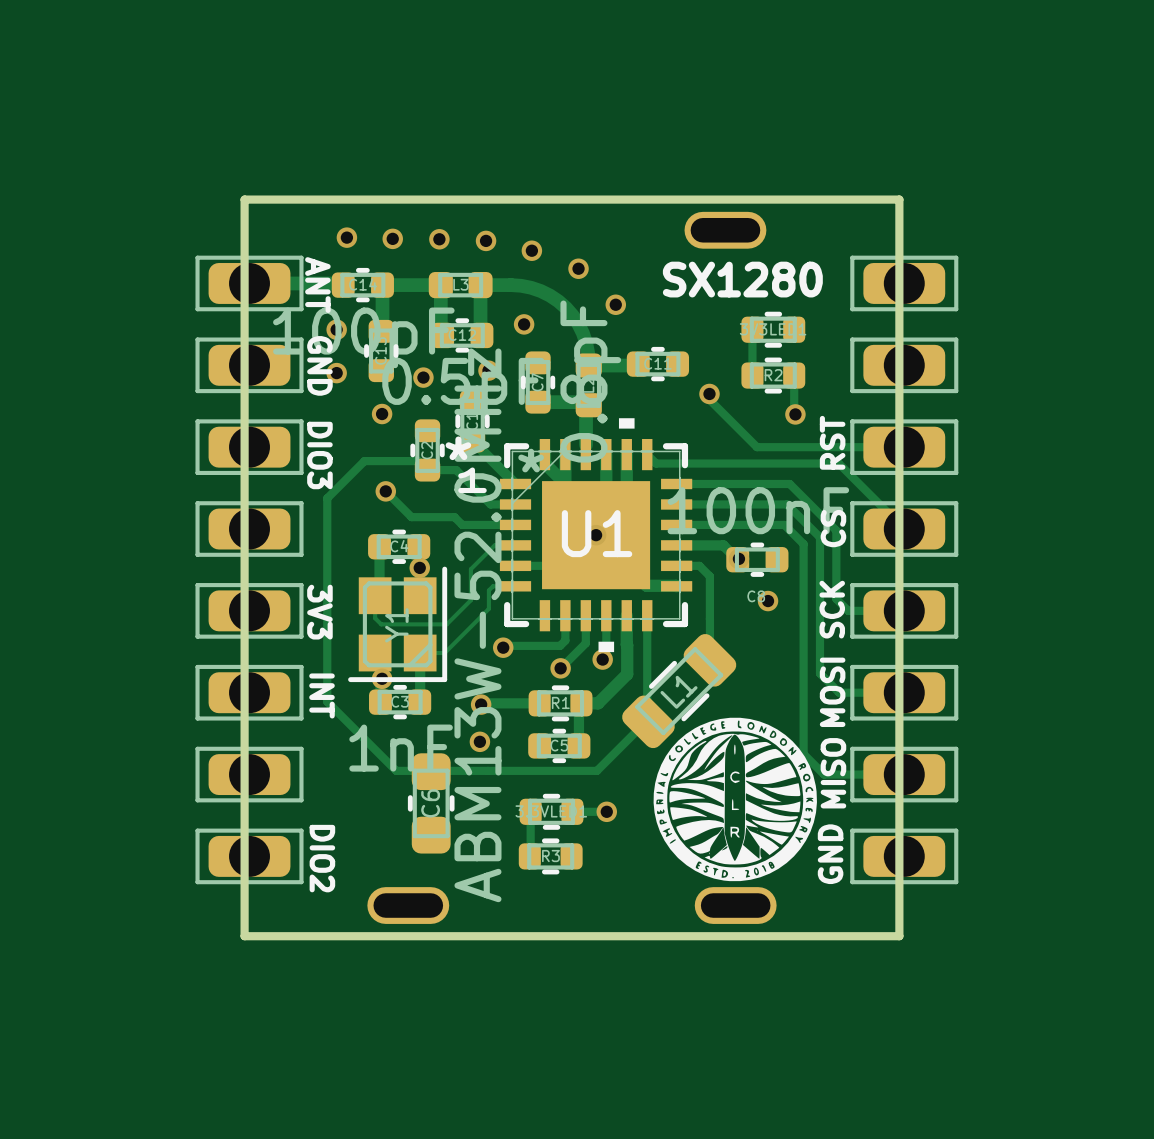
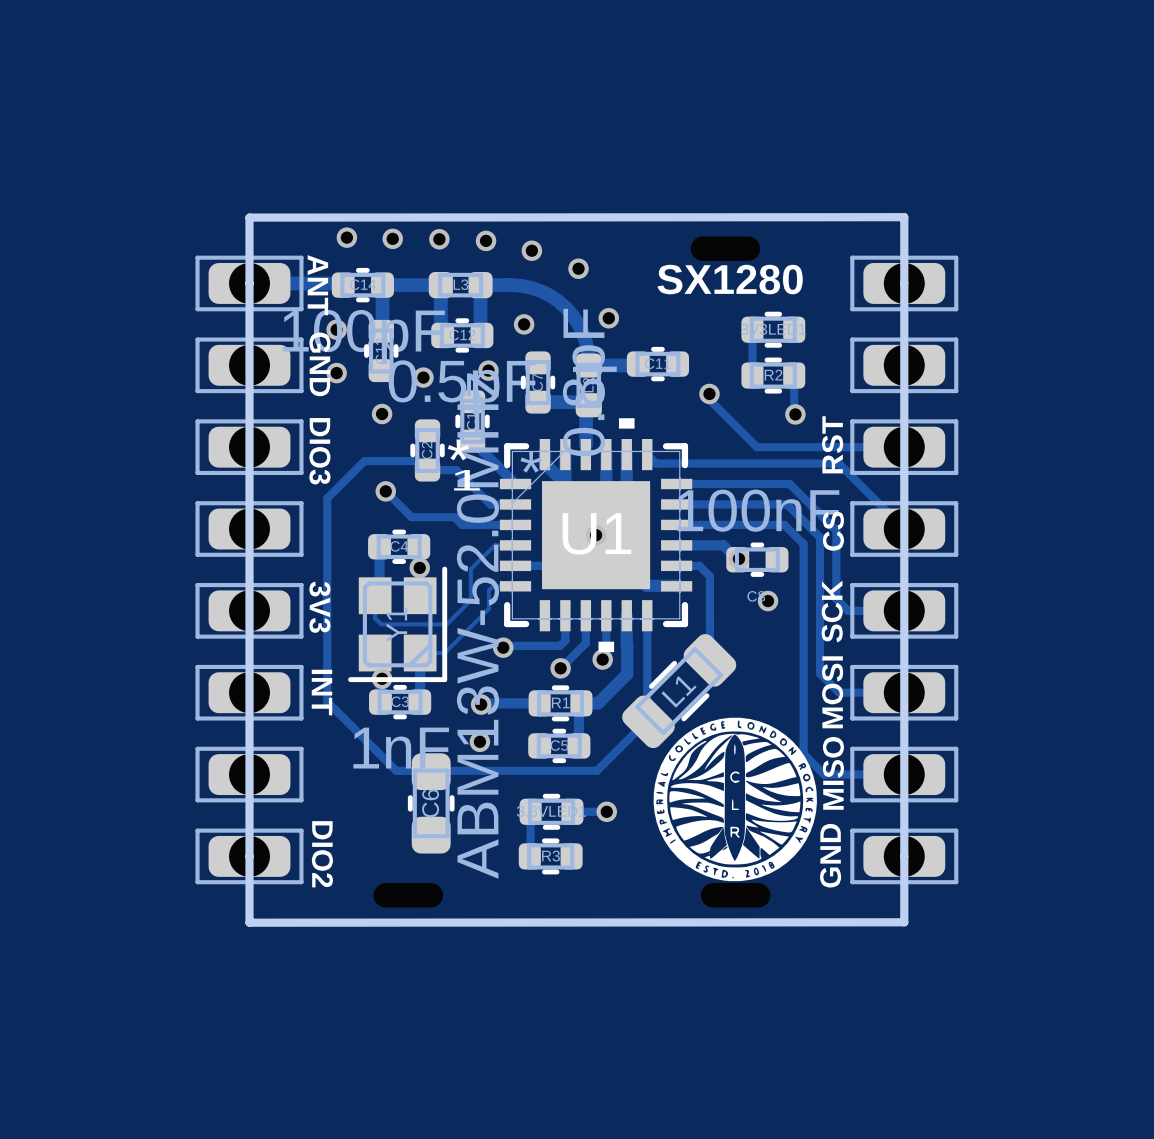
board edge: (244, 199) (244, 936) (899, 936) (899, 199) (244, 199) -> (904, 217) (249, 217) (249, 922) (904, 922) (904, 217)
part footprint: [684, 211, 767, 249] -> [690, 236, 761, 261]
via position: (615, 304) -> (608, 318)
part footprint: [367, 887, 450, 924] -> [373, 883, 444, 908]
part footprint: [694, 887, 777, 924] -> [700, 883, 771, 908]

